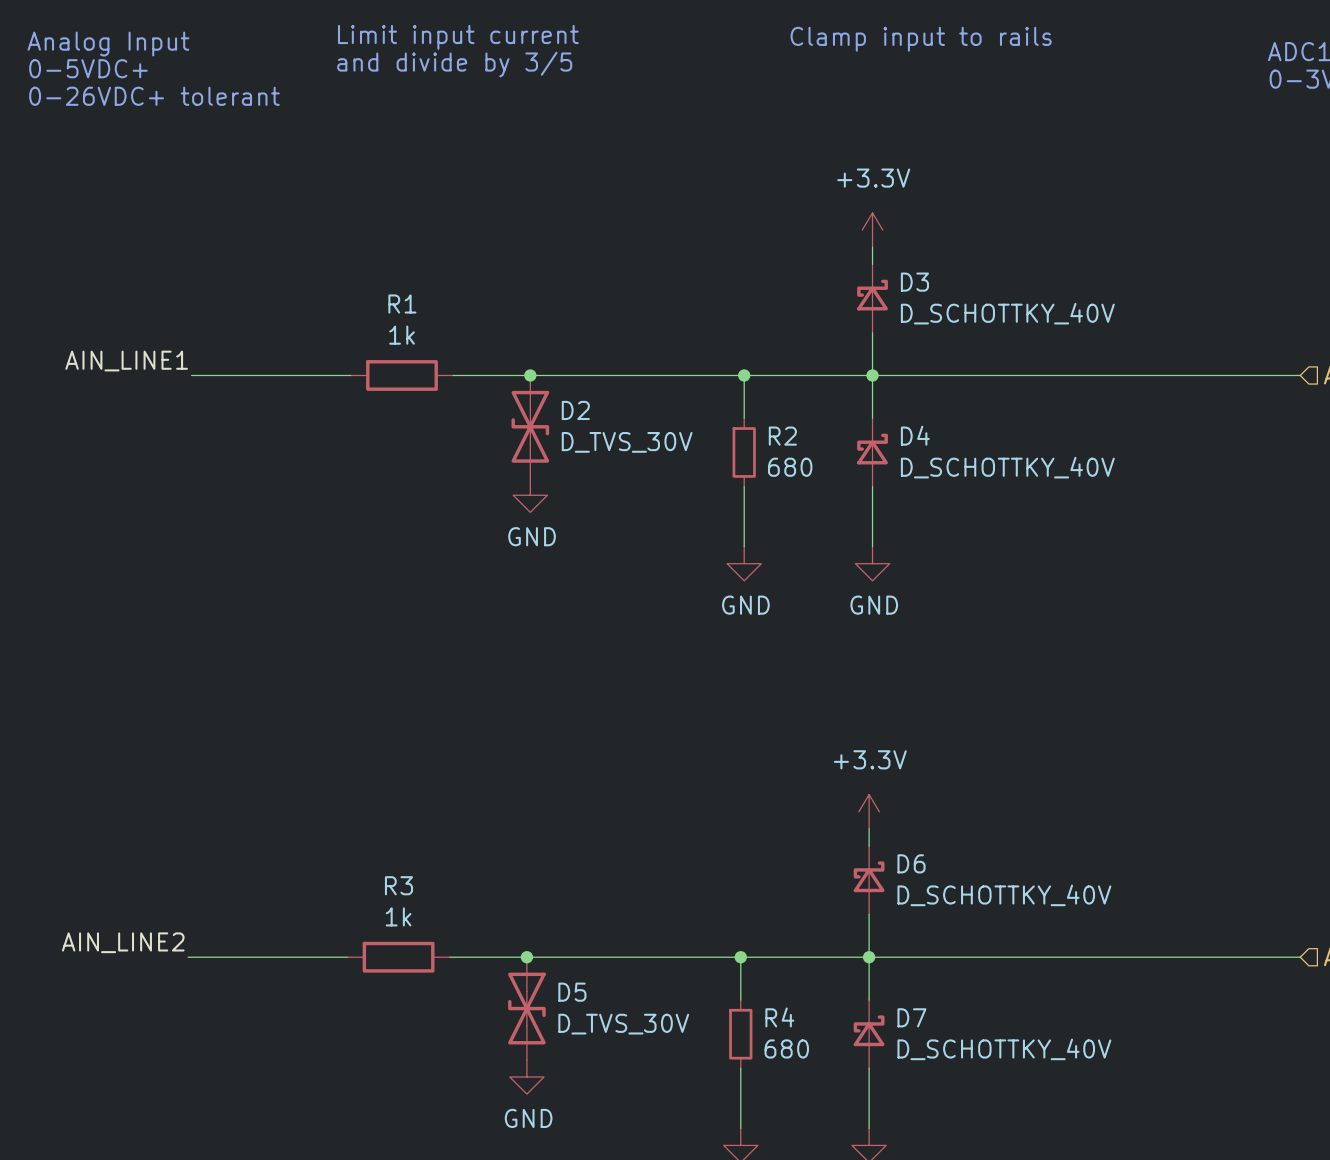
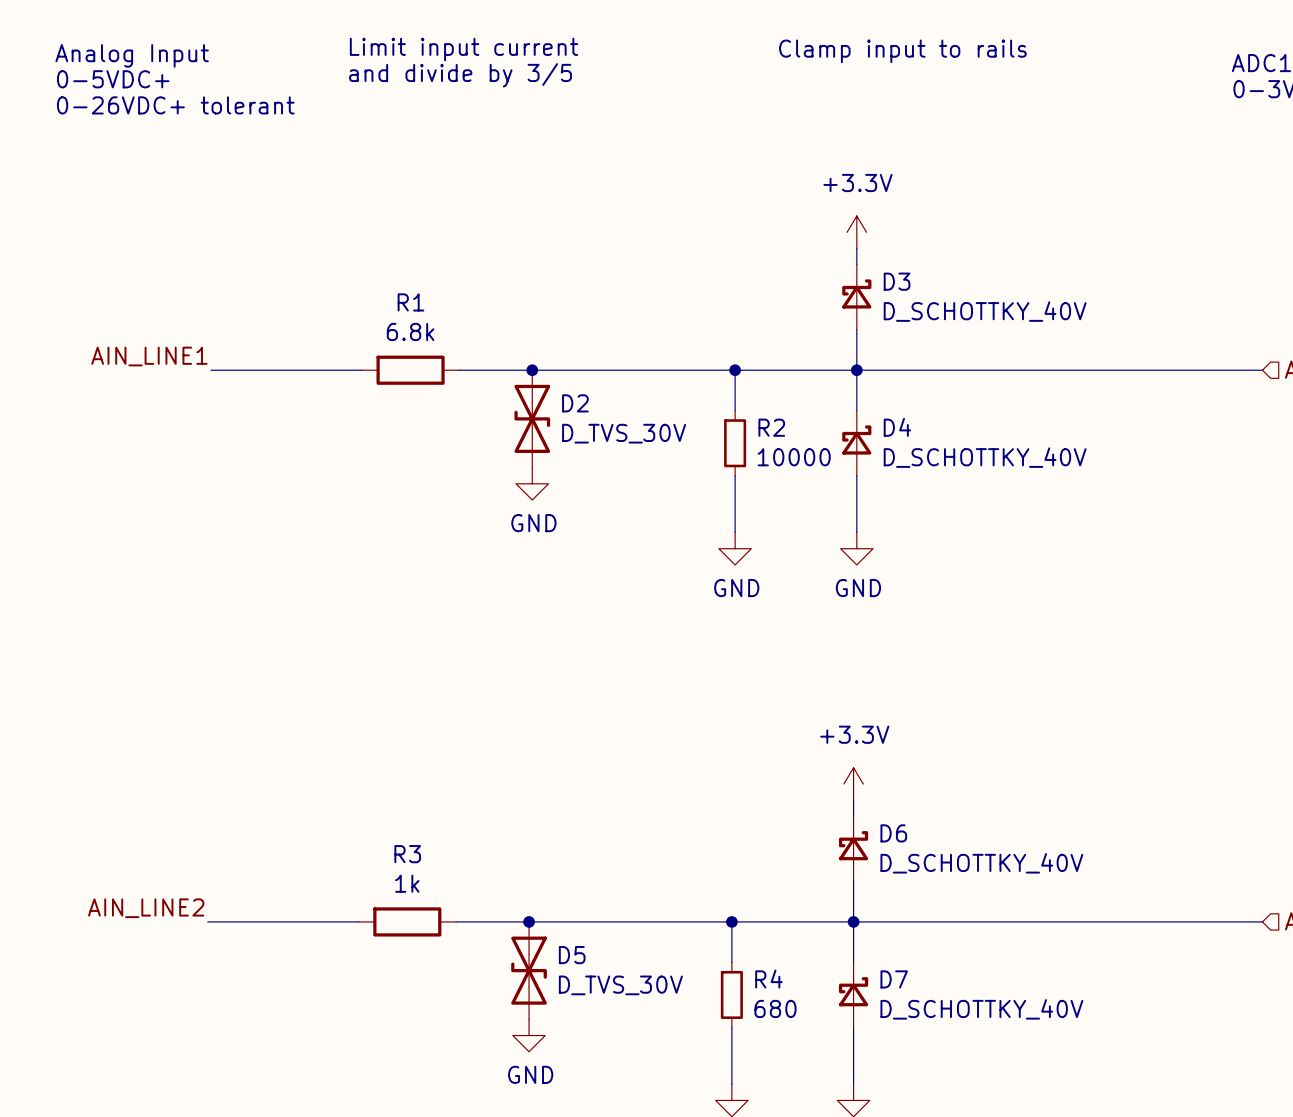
R1 value: 1k (402, 335) -> 6.8k (410, 331)
R2 value: 680 (790, 467) -> 10000 (794, 457)

